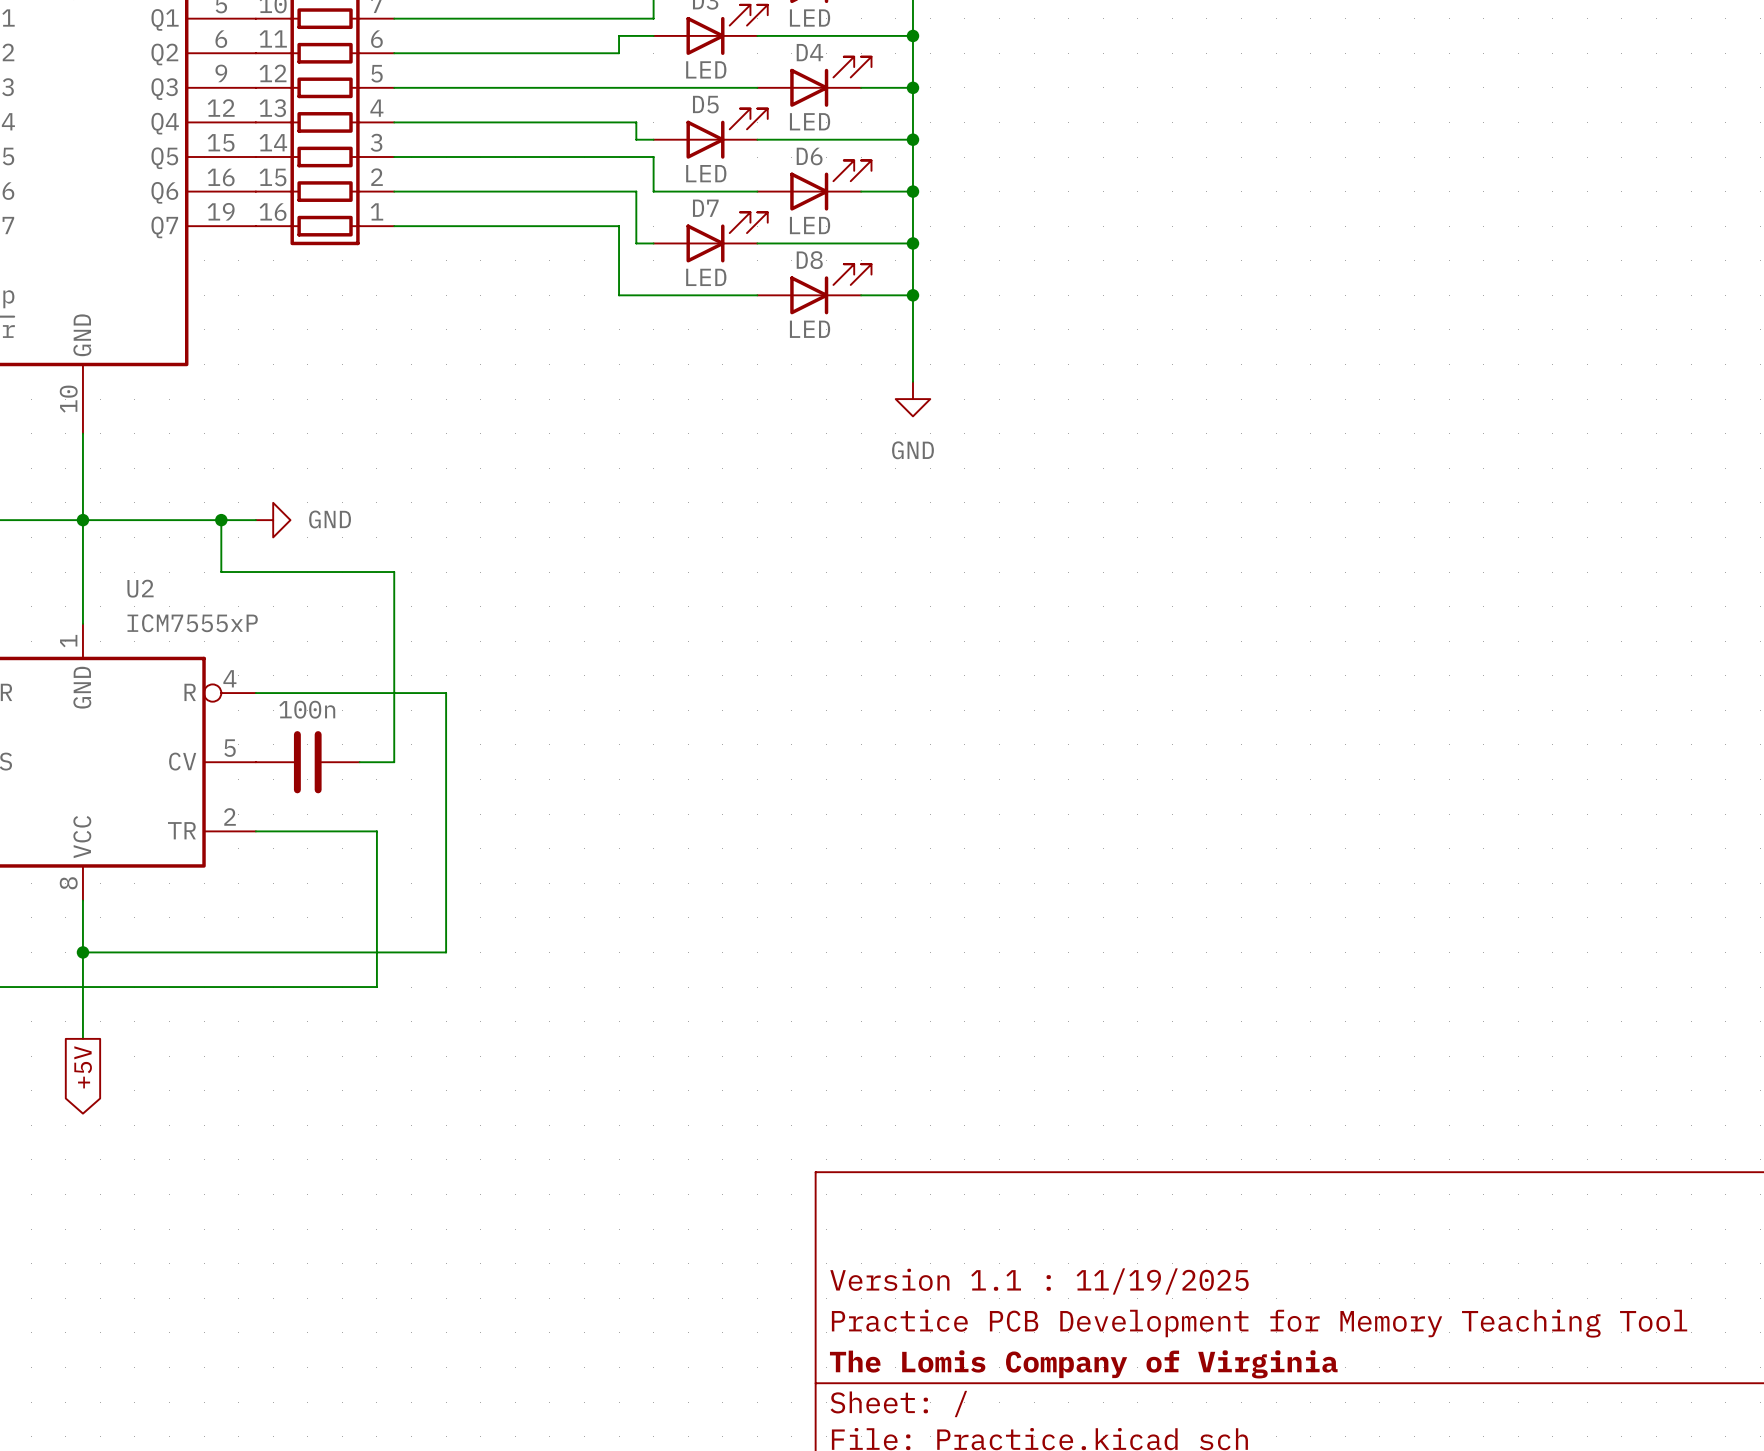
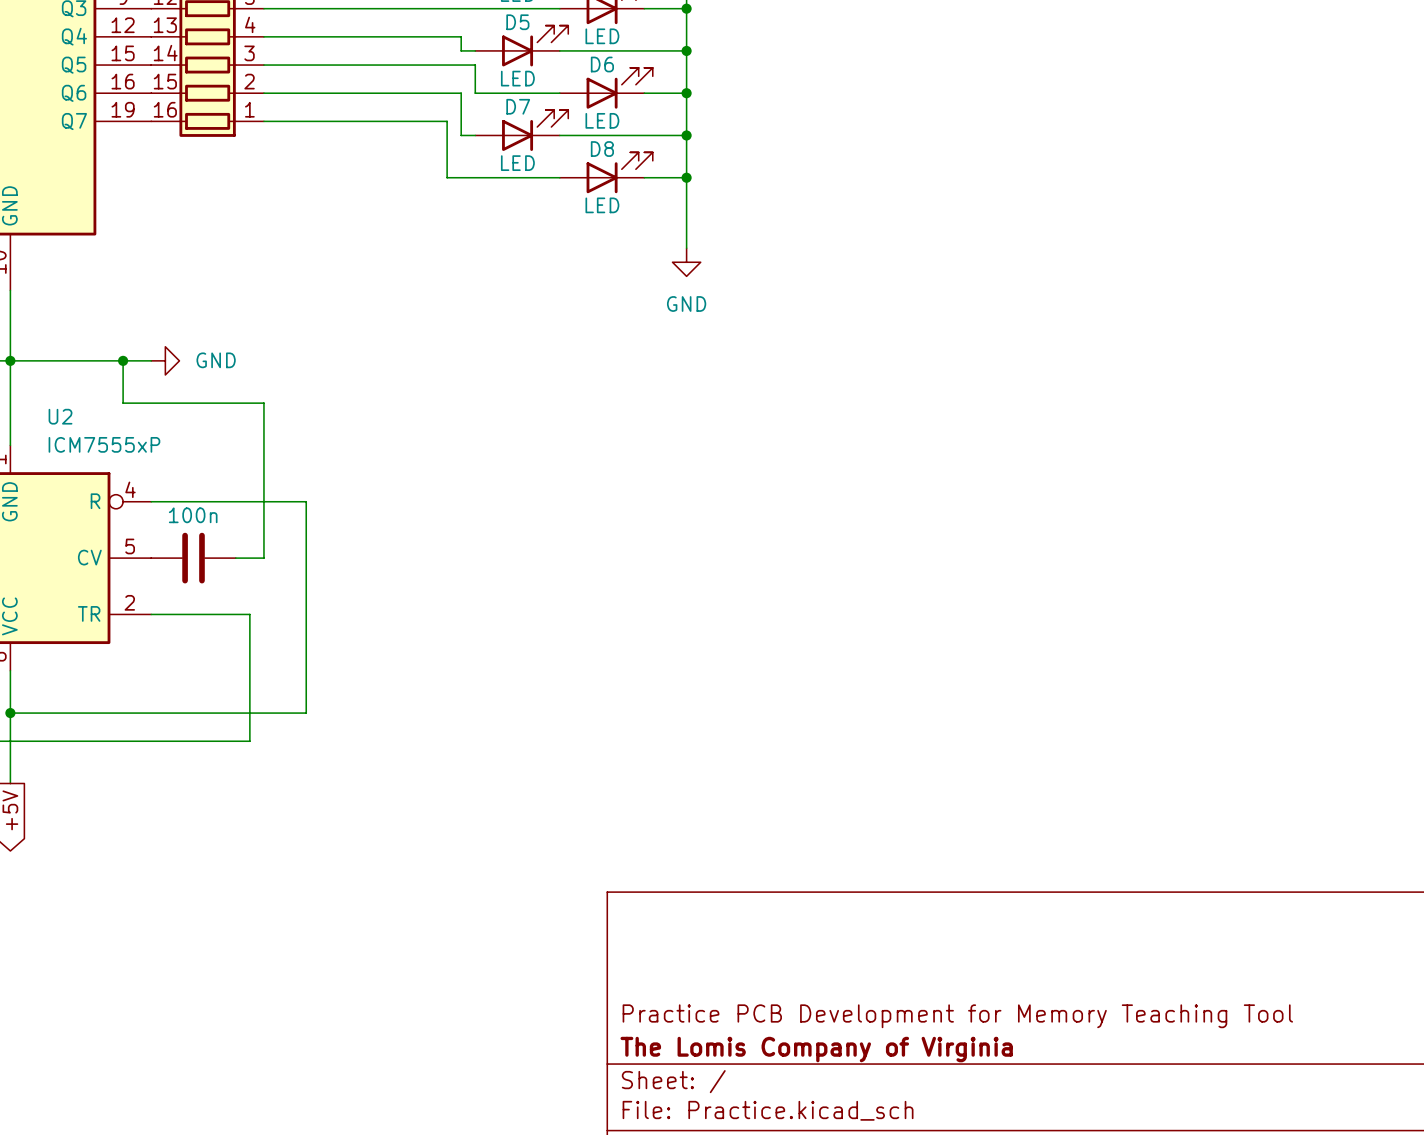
title block: Version 1.1 : 11/19/2025 (1039, 1281) -> none

